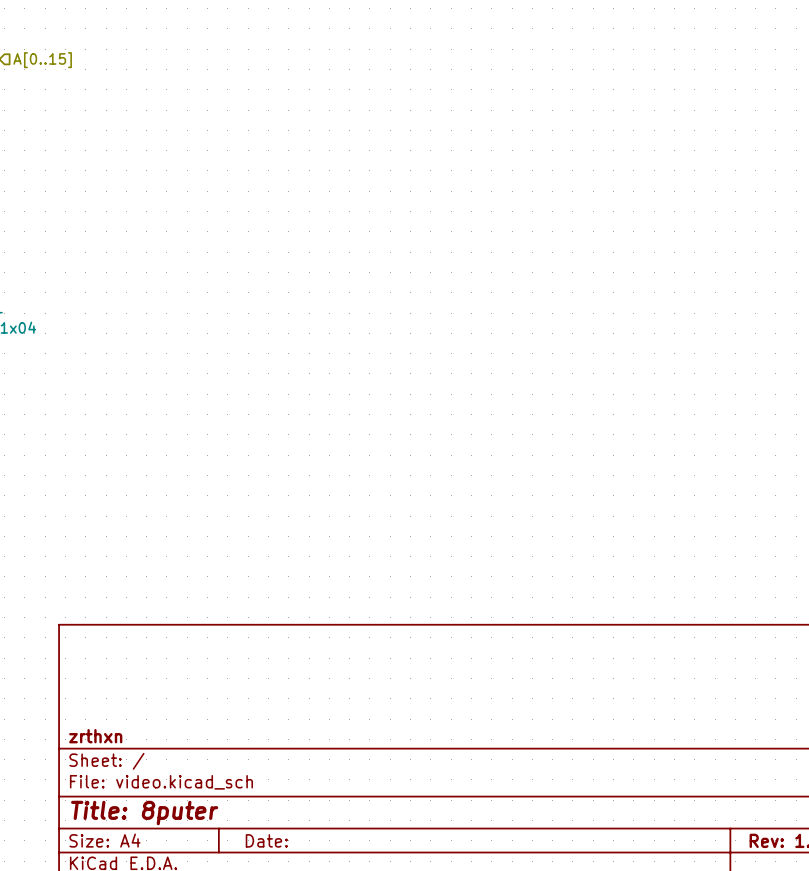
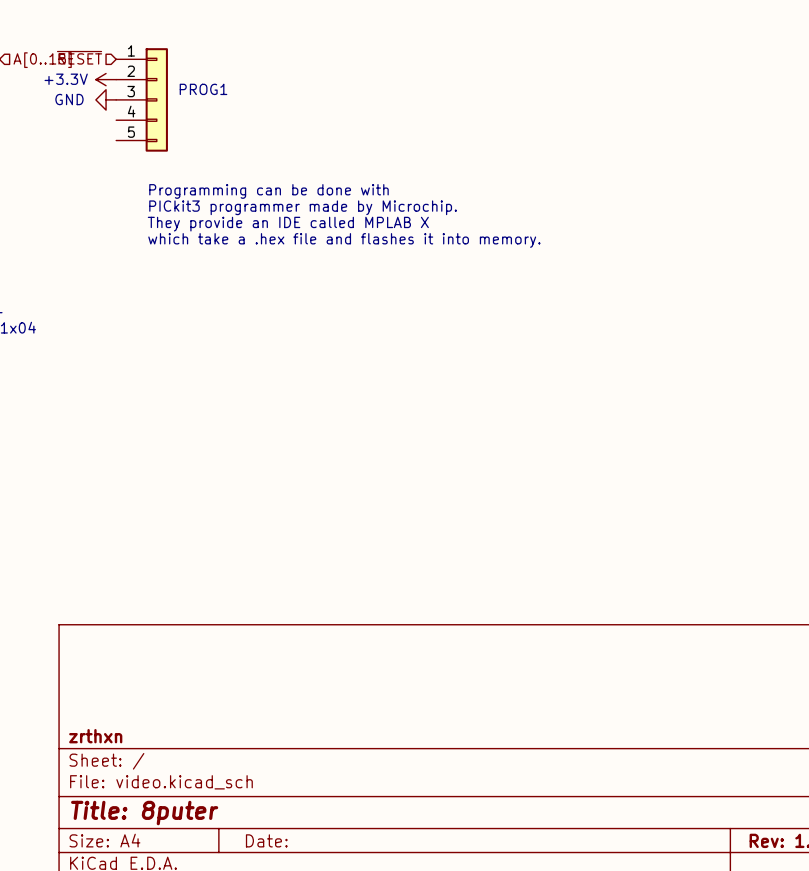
hierarchical label: none -> ~{RESET} (79, 57)
power symbol: none -> +3.3V (106, 79)
power symbol: none -> GND (106, 99)
PROG1: none -> (142, 99)
text: none -> Programming can be done with (268, 191)
text: none -> PICkit3 programmer made by Microchip. (303, 207)
text: none -> They provide an IDE called MPLAB X (288, 224)
text: none -> which take a .hex file and flashes it into memory. (344, 240)

